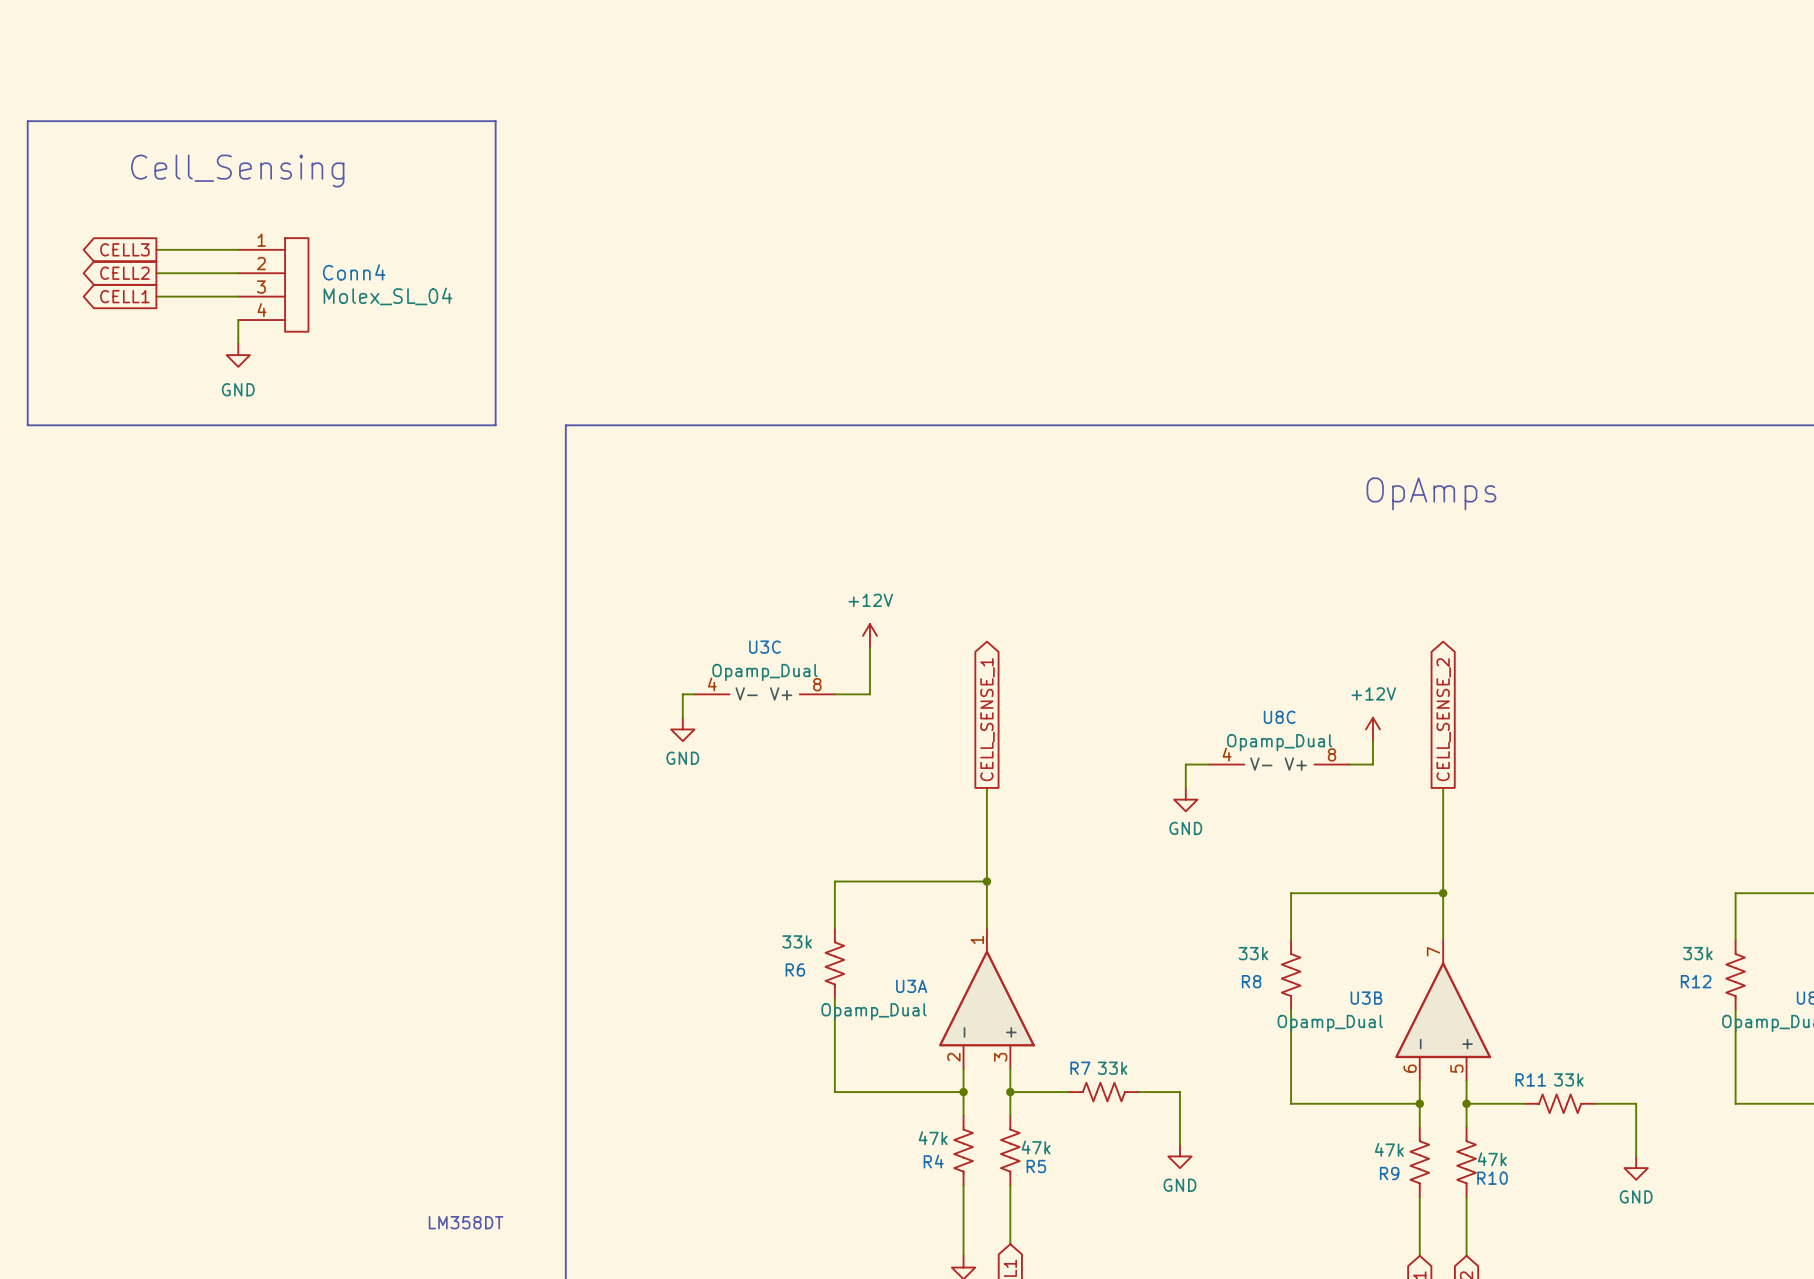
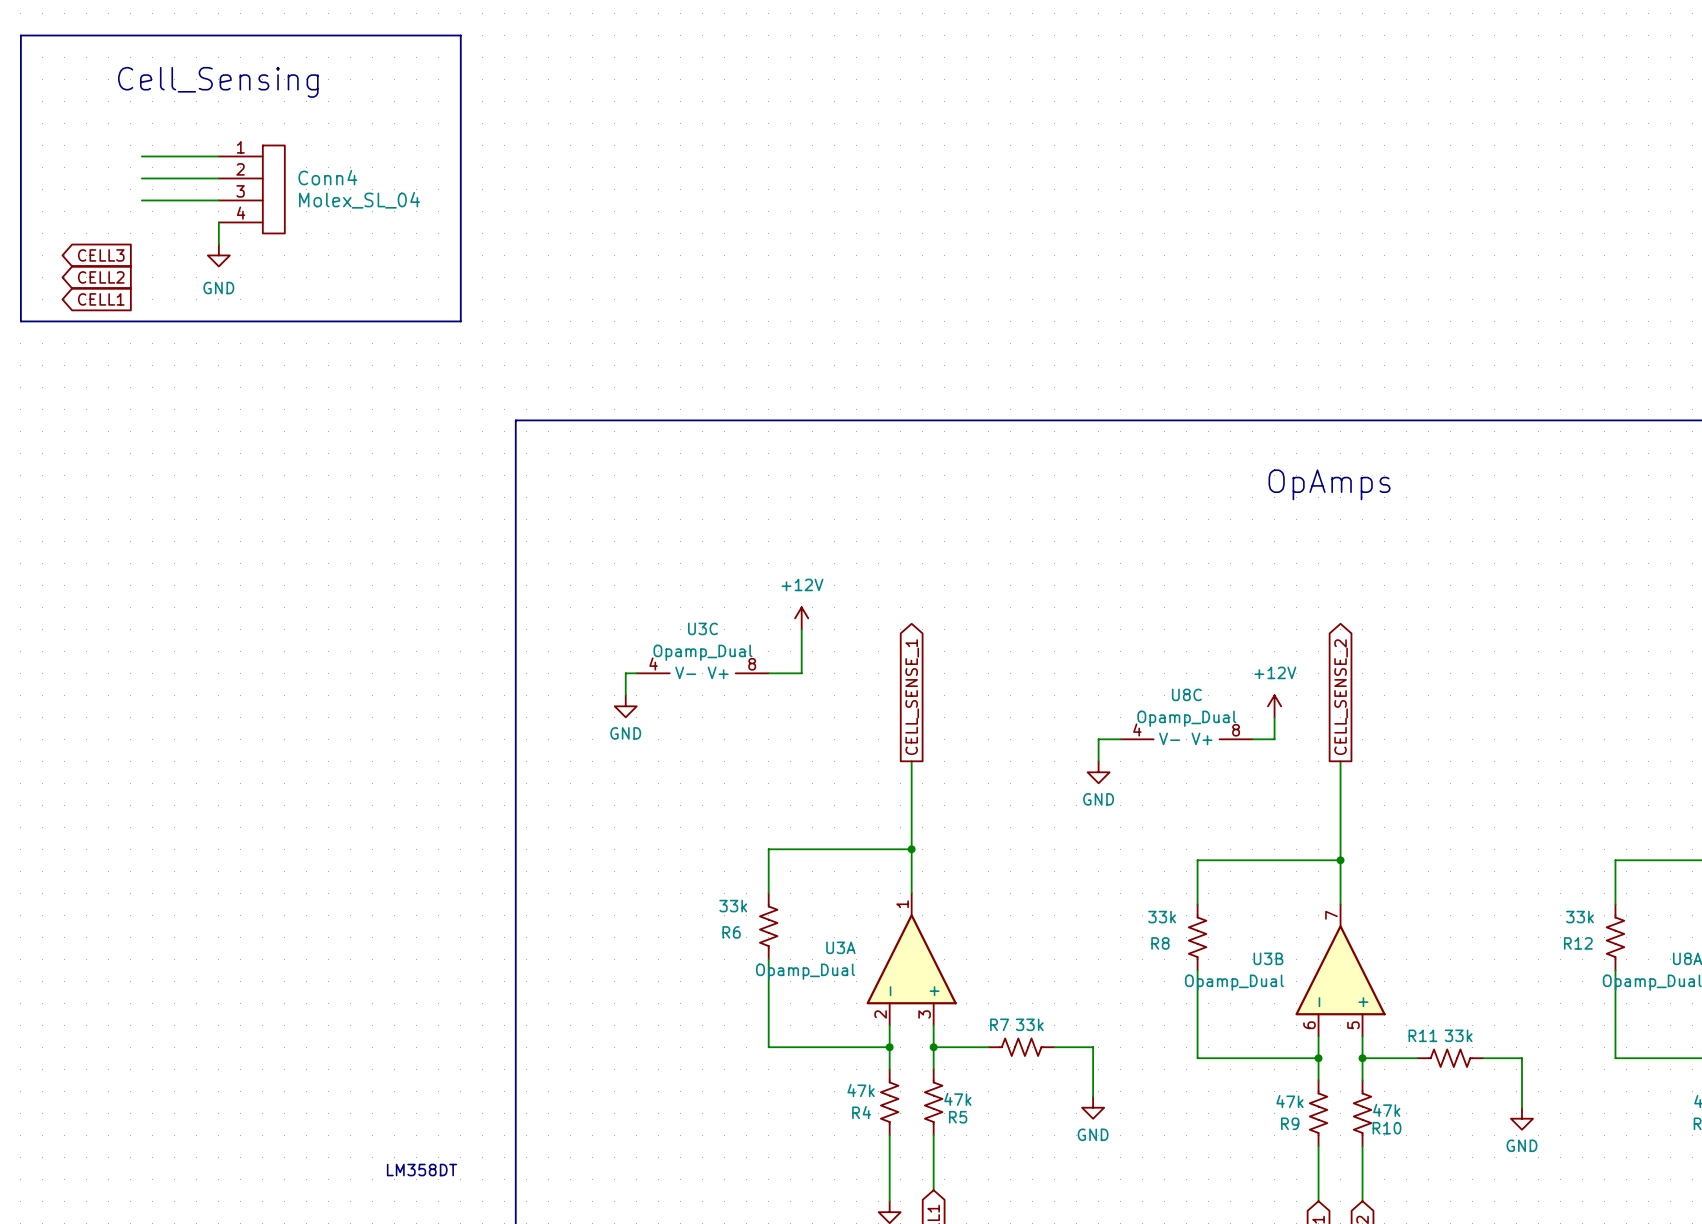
line: (27, 121) (495, 121) (495, 425) (27, 425) (27, 121) -> (20, 35) (460, 35) (460, 321) (20, 321) (20, 35)
text position: Cell_Sensing (237, 171) -> Cell_Sensing (218, 82)
wire: (156, 249) (238, 249) -> (141, 156) (218, 156)
wire: (156, 273) (238, 273) -> (141, 178) (218, 178)
Conn4 position: (273, 284) -> (251, 189)
wire: (156, 296) (238, 296) -> (141, 200) (218, 200)
wire: (238, 320) (238, 343) -> (218, 222) (218, 244)
power symbol position: GND (238, 355) -> GND (218, 255)

